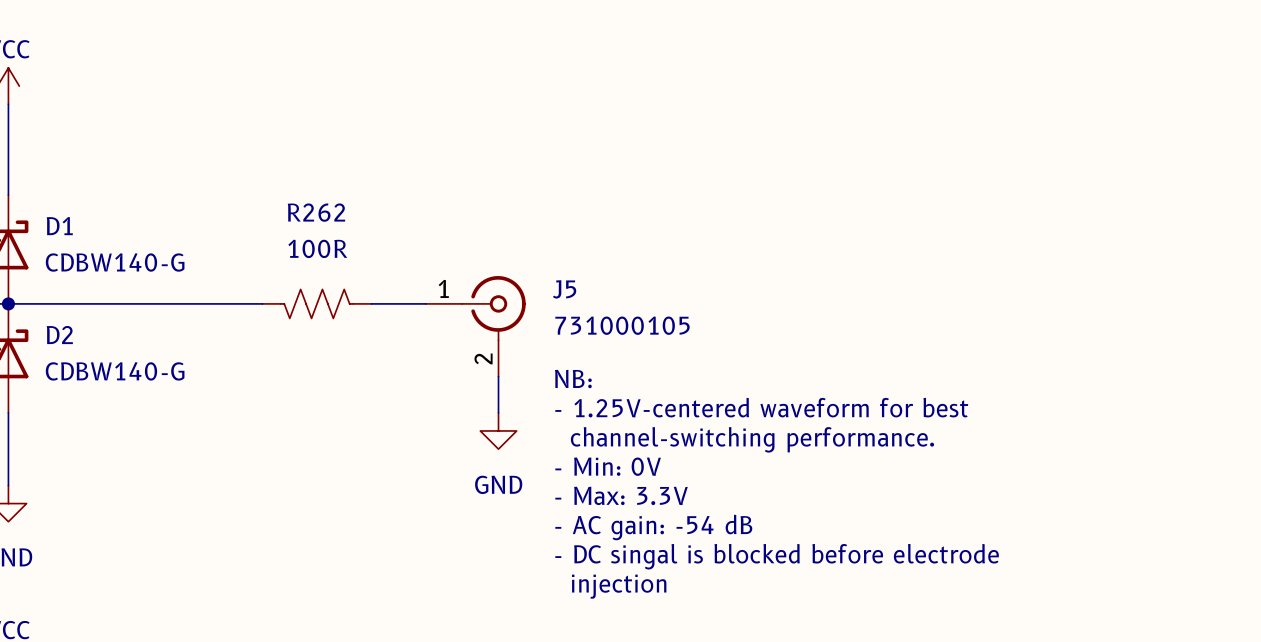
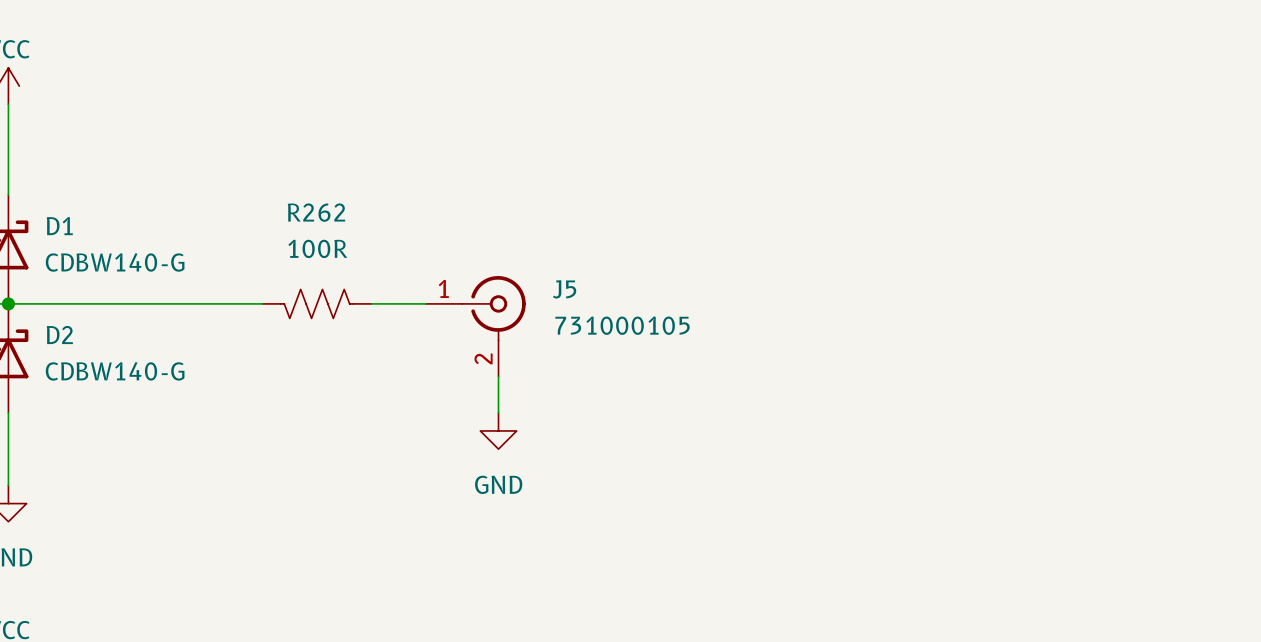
text: NB: (573, 379) -> none
text: - 1.25V-centered waveform for best (761, 407) -> none
text: channel-switching performance. (752, 439) -> none
text: - Min: 0V (608, 466) -> none
text: - Max: 3.3V (621, 495) -> none
text: - AC gain: -54 dB (653, 527) -> none
text: - DC singal is blocked before electrode (777, 556) -> none
text: injection (619, 586) -> none

